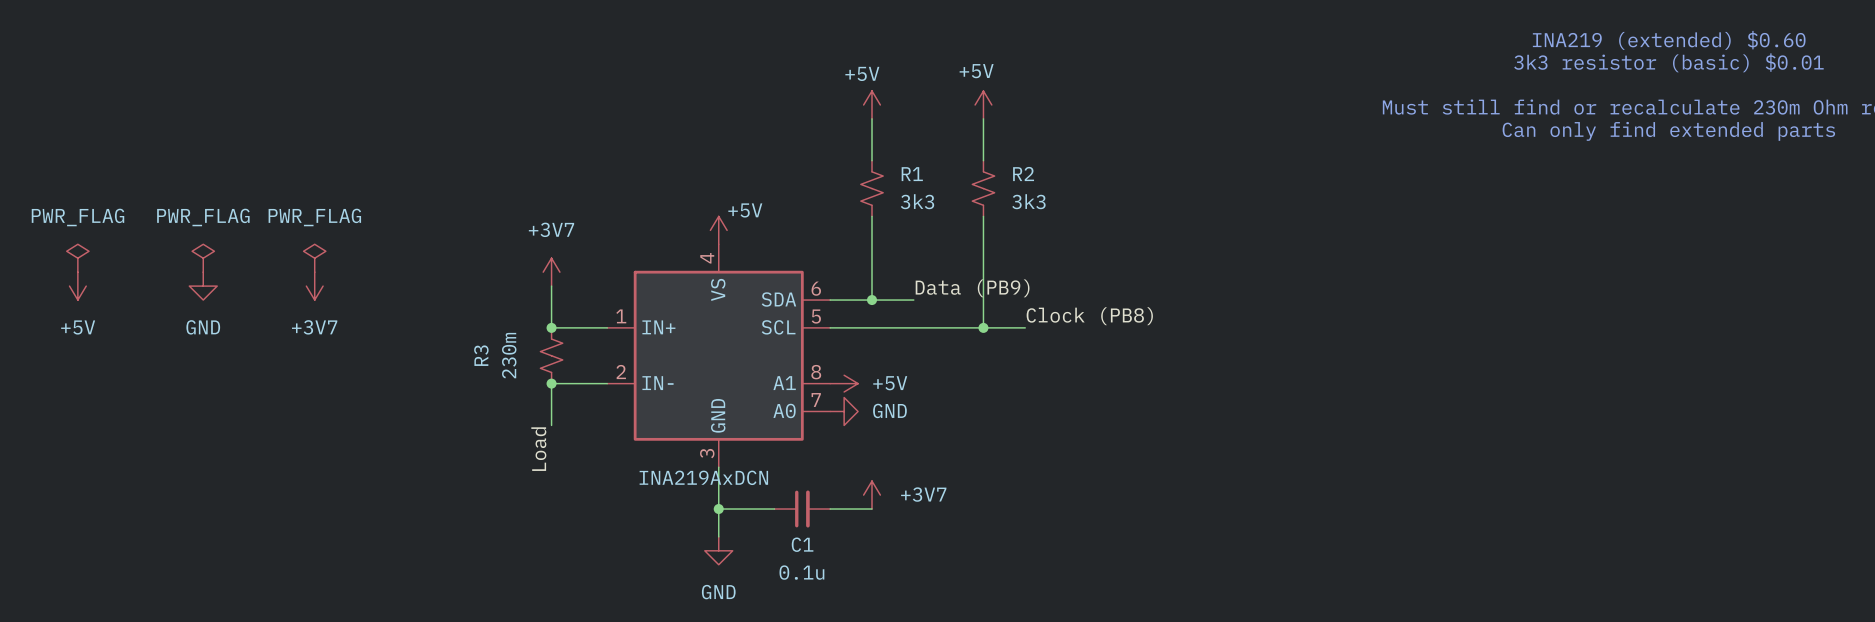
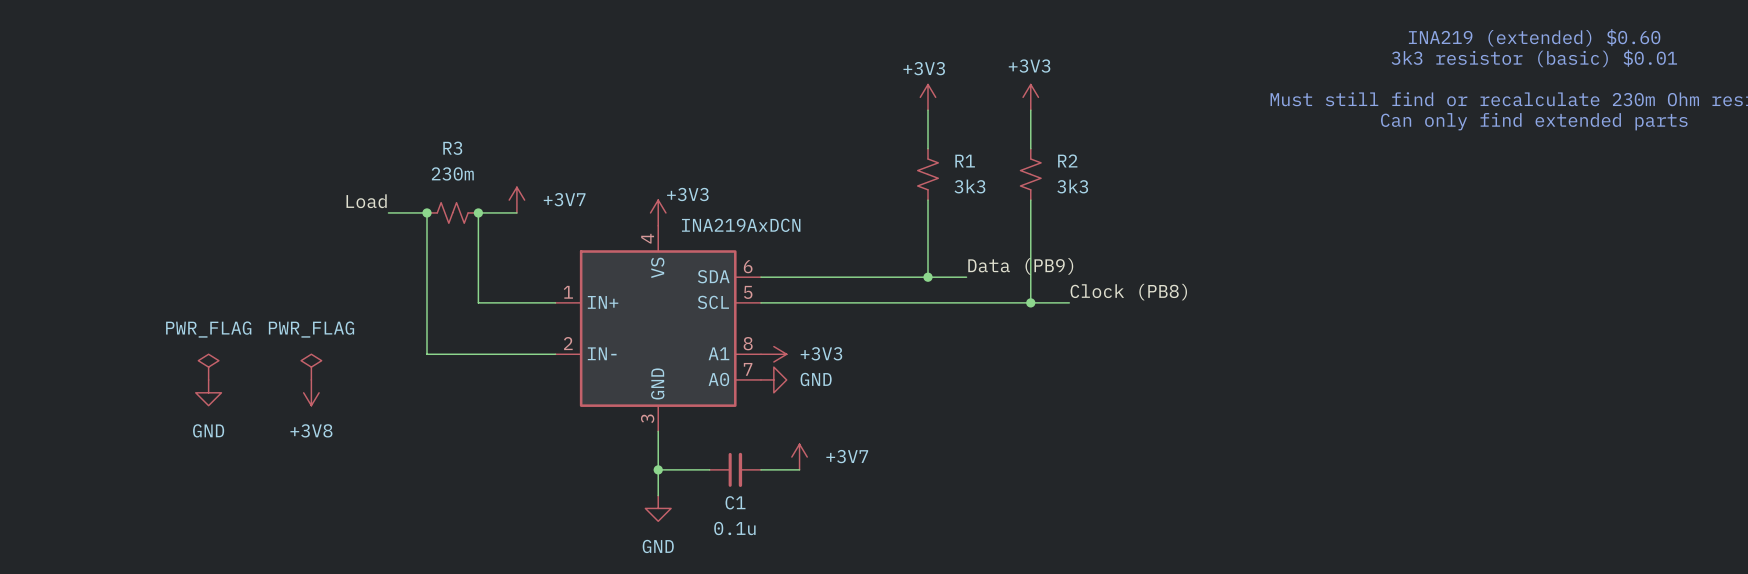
power symbol: +5V (872, 104) -> none
power symbol: +5V (983, 104) -> none
power symbol: none -> +3V3 (928, 97)
power symbol: none -> +3V3 (1030, 97)
wire: (872, 118) (872, 160) -> (928, 110) (928, 148)
wire: (983, 118) (983, 160) -> (1030, 110) (1030, 148)
R1 position: (872, 188) -> (928, 174)
R2 position: (983, 188) -> (1030, 174)
wire: (872, 216) (872, 300) -> (928, 200) (928, 277)
wire: (983, 216) (983, 327) -> (1030, 200) (1030, 302)
power symbol text position: +3V7 (551, 229) -> +3V7 (564, 199)
junction: none -> (426, 212)
junction: none -> (478, 212)
power symbol: +5V (718, 230) -> +3V3 (658, 212)
power symbol: PWR_FLAG (77, 258) -> none
power symbol: PWR_FLAG (203, 258) -> none
power symbol: PWR_FLAG (314, 258) -> none
power symbol position: +3V7 (551, 272) -> +3V7 (516, 200)
power symbol: +5V (77, 286) -> none
power symbol position: GND (203, 286) -> GND (208, 392)
power symbol: +3V7 (314, 286) -> none
wire: (551, 286) (551, 327) -> (516, 212) (478, 212) (478, 302) (504, 302)
label position: Data (PB9) (972, 288) -> Data (PB9) (1020, 266)
junction: (872, 300) -> none
wire: none -> (838, 277) (966, 277)
label position: Clock (PB8) (1089, 316) -> Clock (PB8) (1128, 292)
junction: (551, 327) -> none
junction position: (983, 327) -> (928, 277)
wire: none -> (940, 302) (1069, 302)
junction: none -> (1030, 302)
R3 rotation: 0° (551, 355) -> 90° clockwise (452, 212)
R3 position: (551, 355) -> (452, 212)
wire: (551, 383) (551, 425) -> (504, 354) (426, 354) (426, 212) (388, 212)
junction: (551, 383) -> none
power symbol: +5V (844, 383) -> +3V3 (773, 354)
power symbol: none -> PWR_FLAG (208, 367)
power symbol: none -> PWR_FLAG (311, 367)
power symbol: none -> +3V8 (311, 392)
label rotation: 0° (538, 449) -> 90° clockwise (366, 201)
label position: Load (538, 449) -> Load (366, 201)
part value position: INA219AxDCN (703, 477) -> INA219AxDCN (741, 225)

